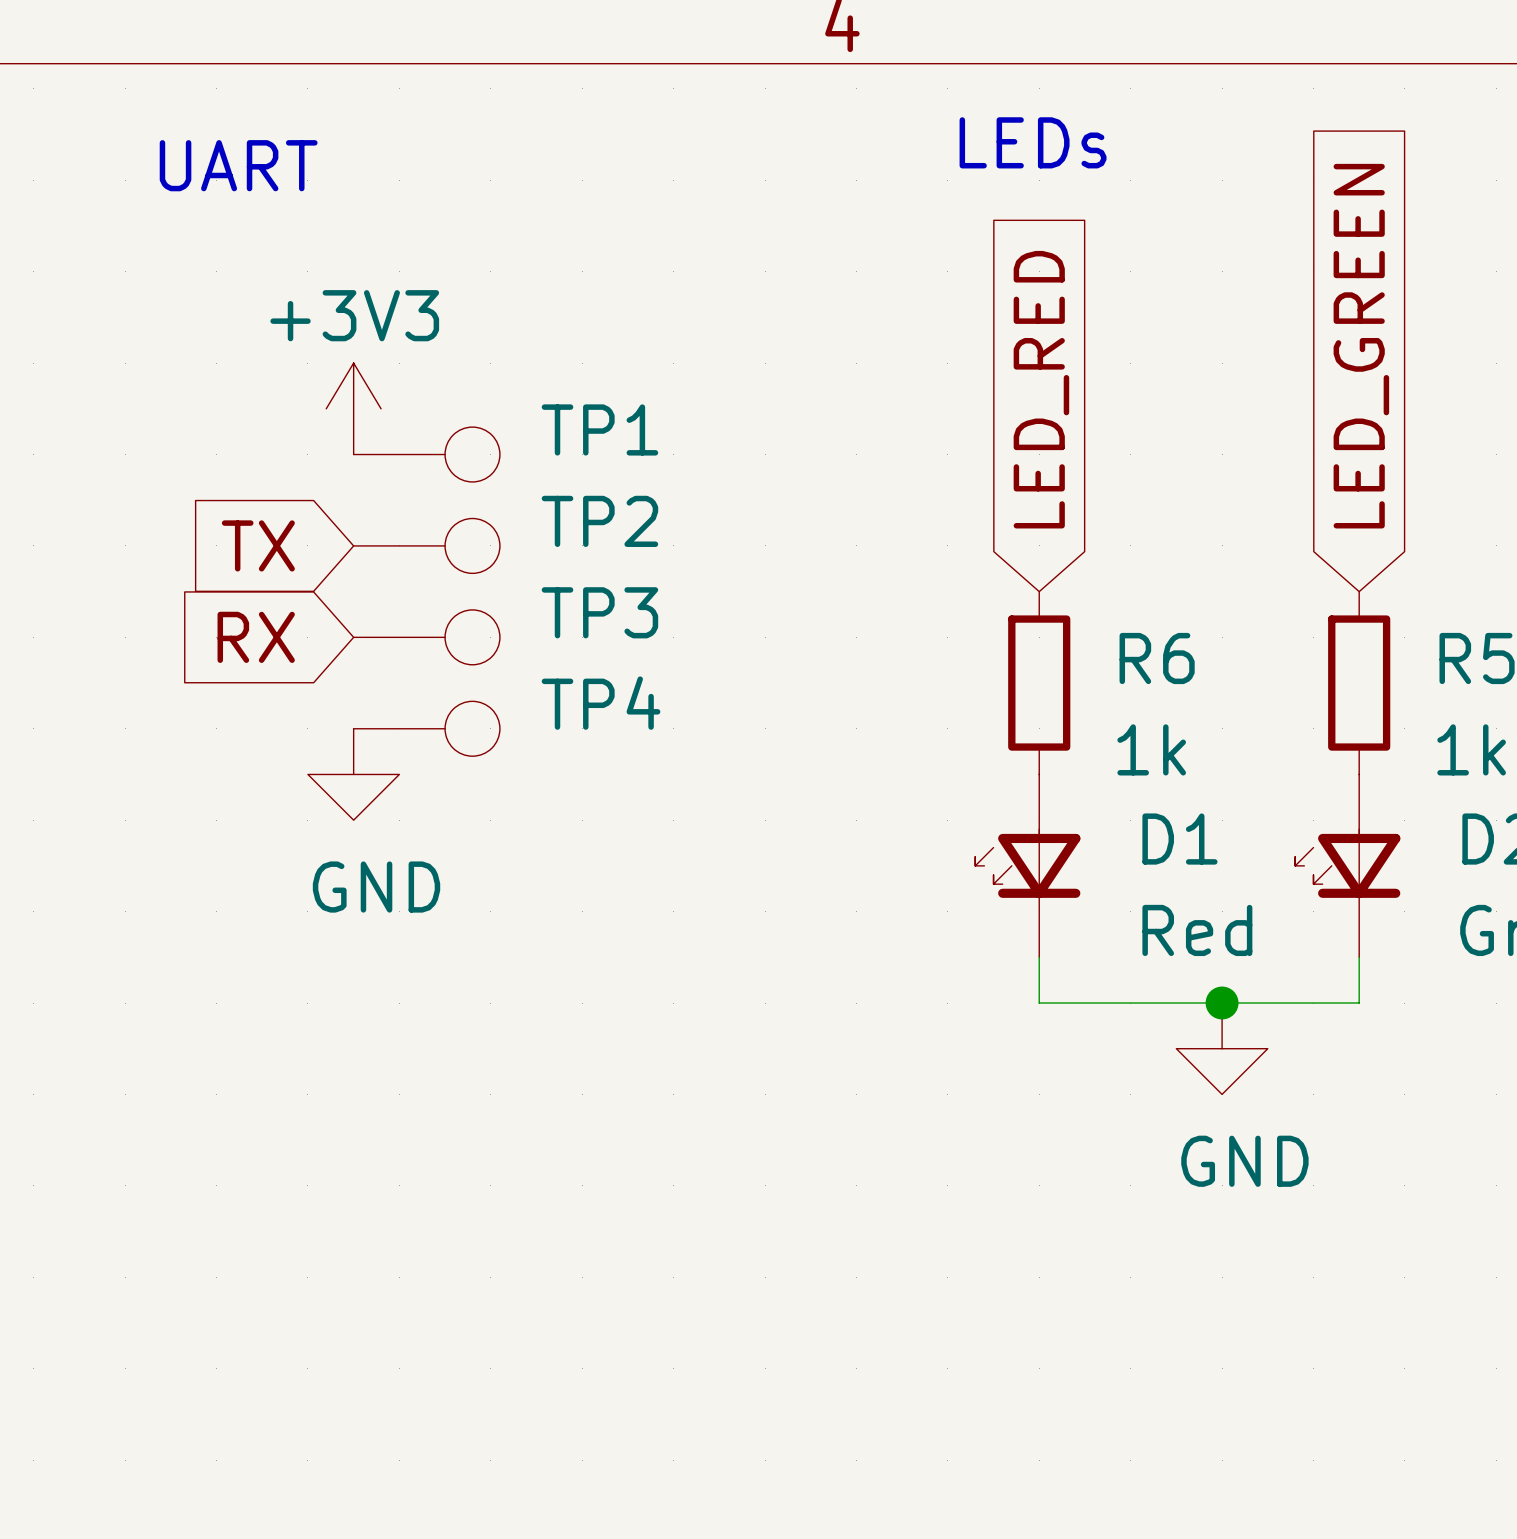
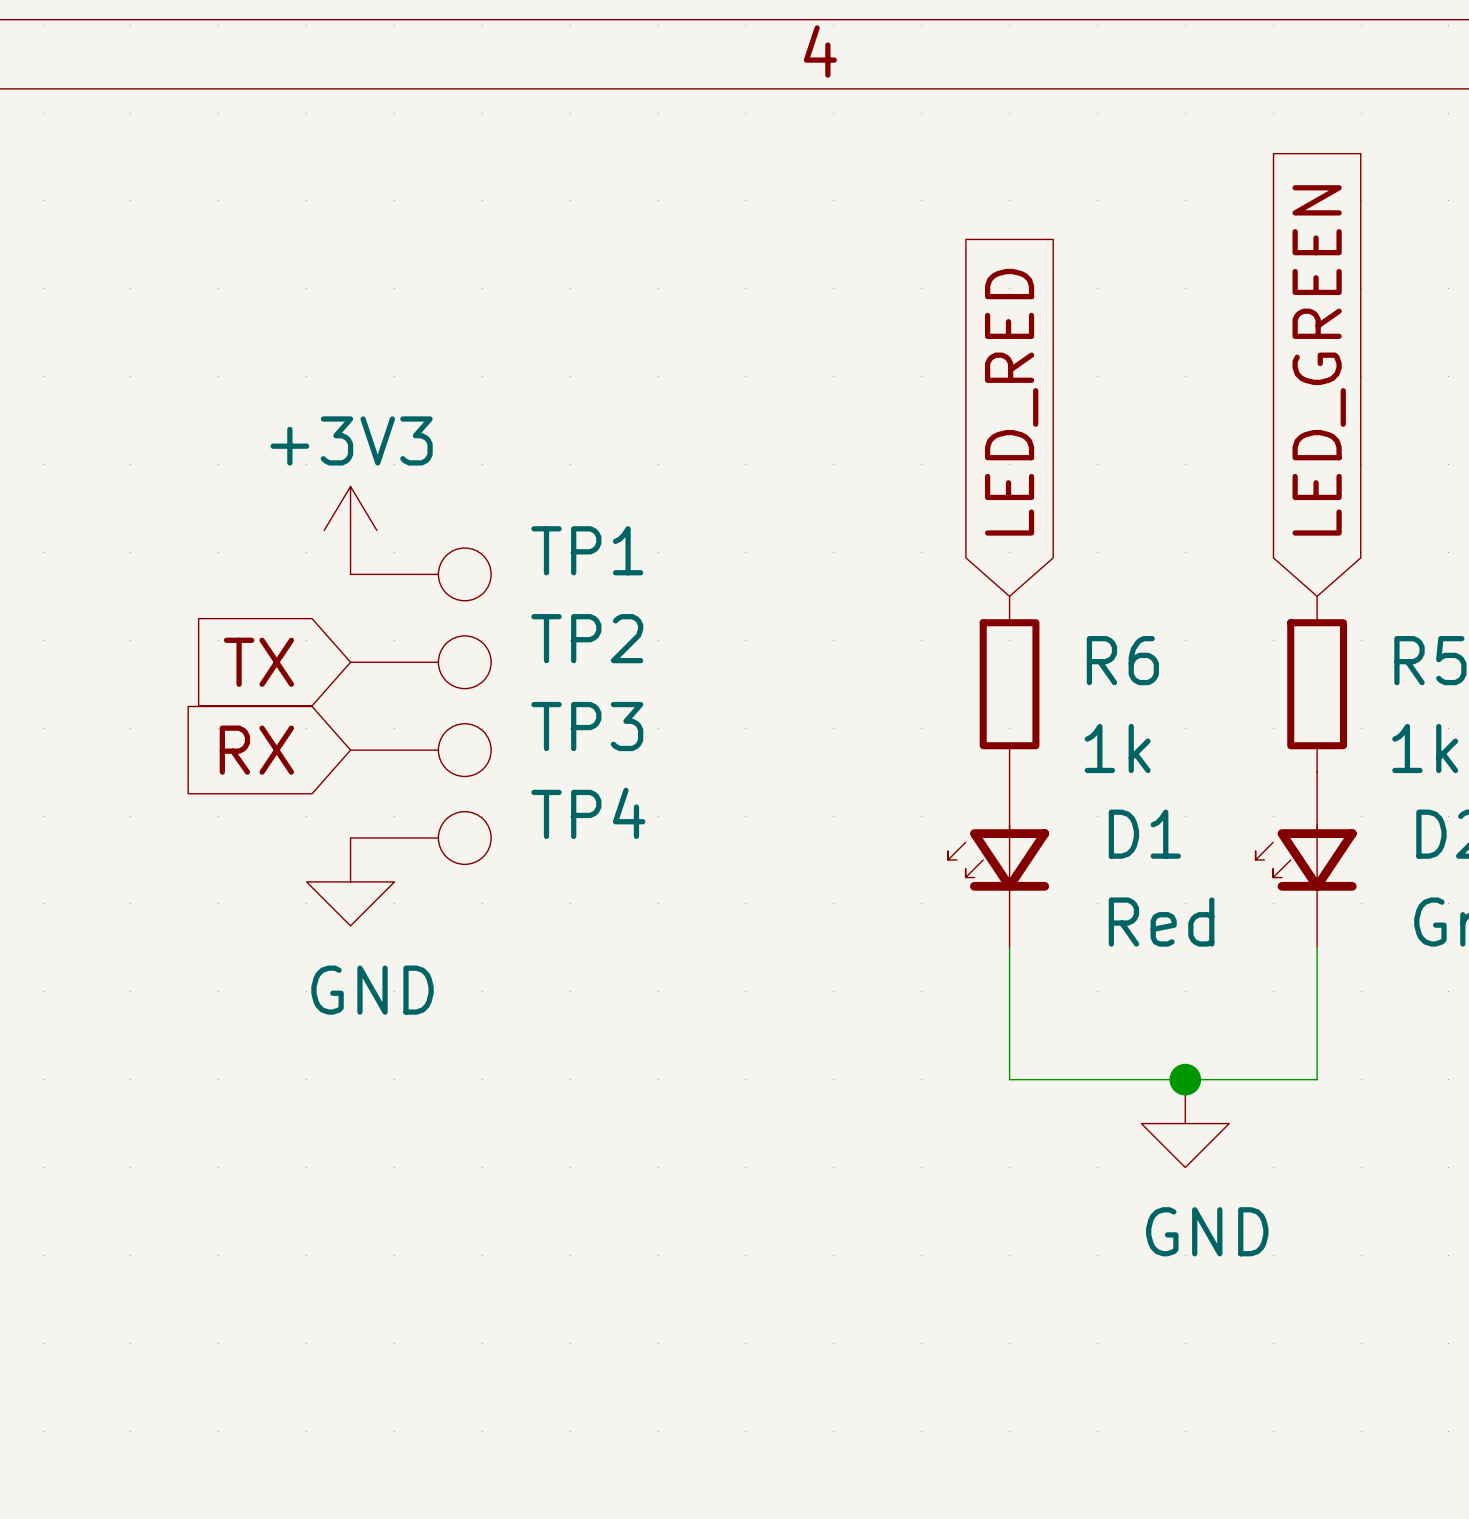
text: LEDs (1033, 142) -> none
text: UART (238, 165) -> none
power symbol position: +3V3 (353, 408) -> +3V3 (350, 530)
TP1 position: (426, 454) -> (420, 574)
global label position: TX (258, 545) -> TX (258, 662)
TP2 position: (426, 545) -> (420, 662)
global label position: RX (256, 637) -> RX (256, 750)
TP3 position: (426, 637) -> (420, 750)
TP4 position: (426, 728) -> (420, 838)
power symbol position: GND (353, 774) -> GND (350, 881)
wire: (1039, 1003) (1359, 1003) -> (1009, 991) (1009, 1079) (1317, 1079) (1317, 991)
junction position: (1222, 1003) -> (1185, 1079)
power symbol position: GND (1222, 1048) -> GND (1185, 1123)

